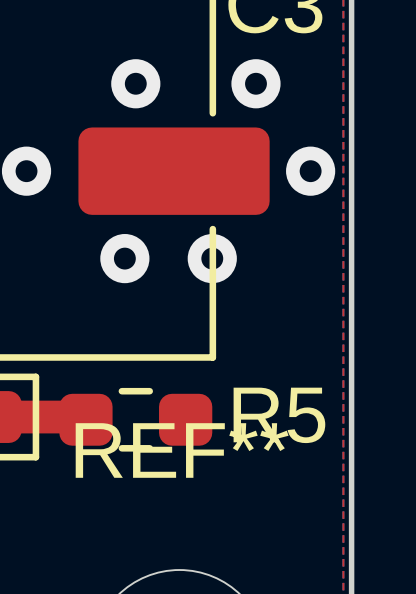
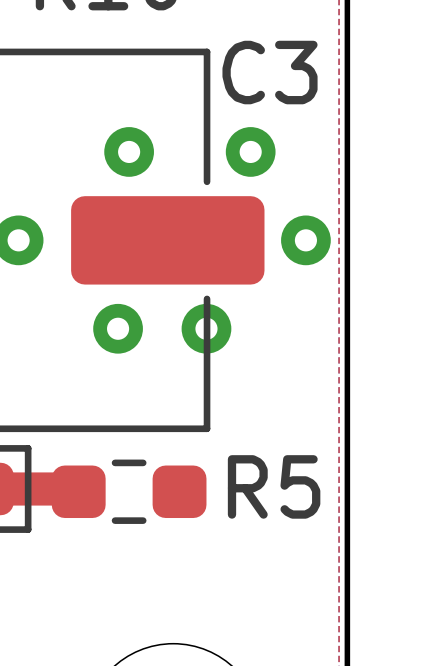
REF** name: REF** (182, 450) -> none

